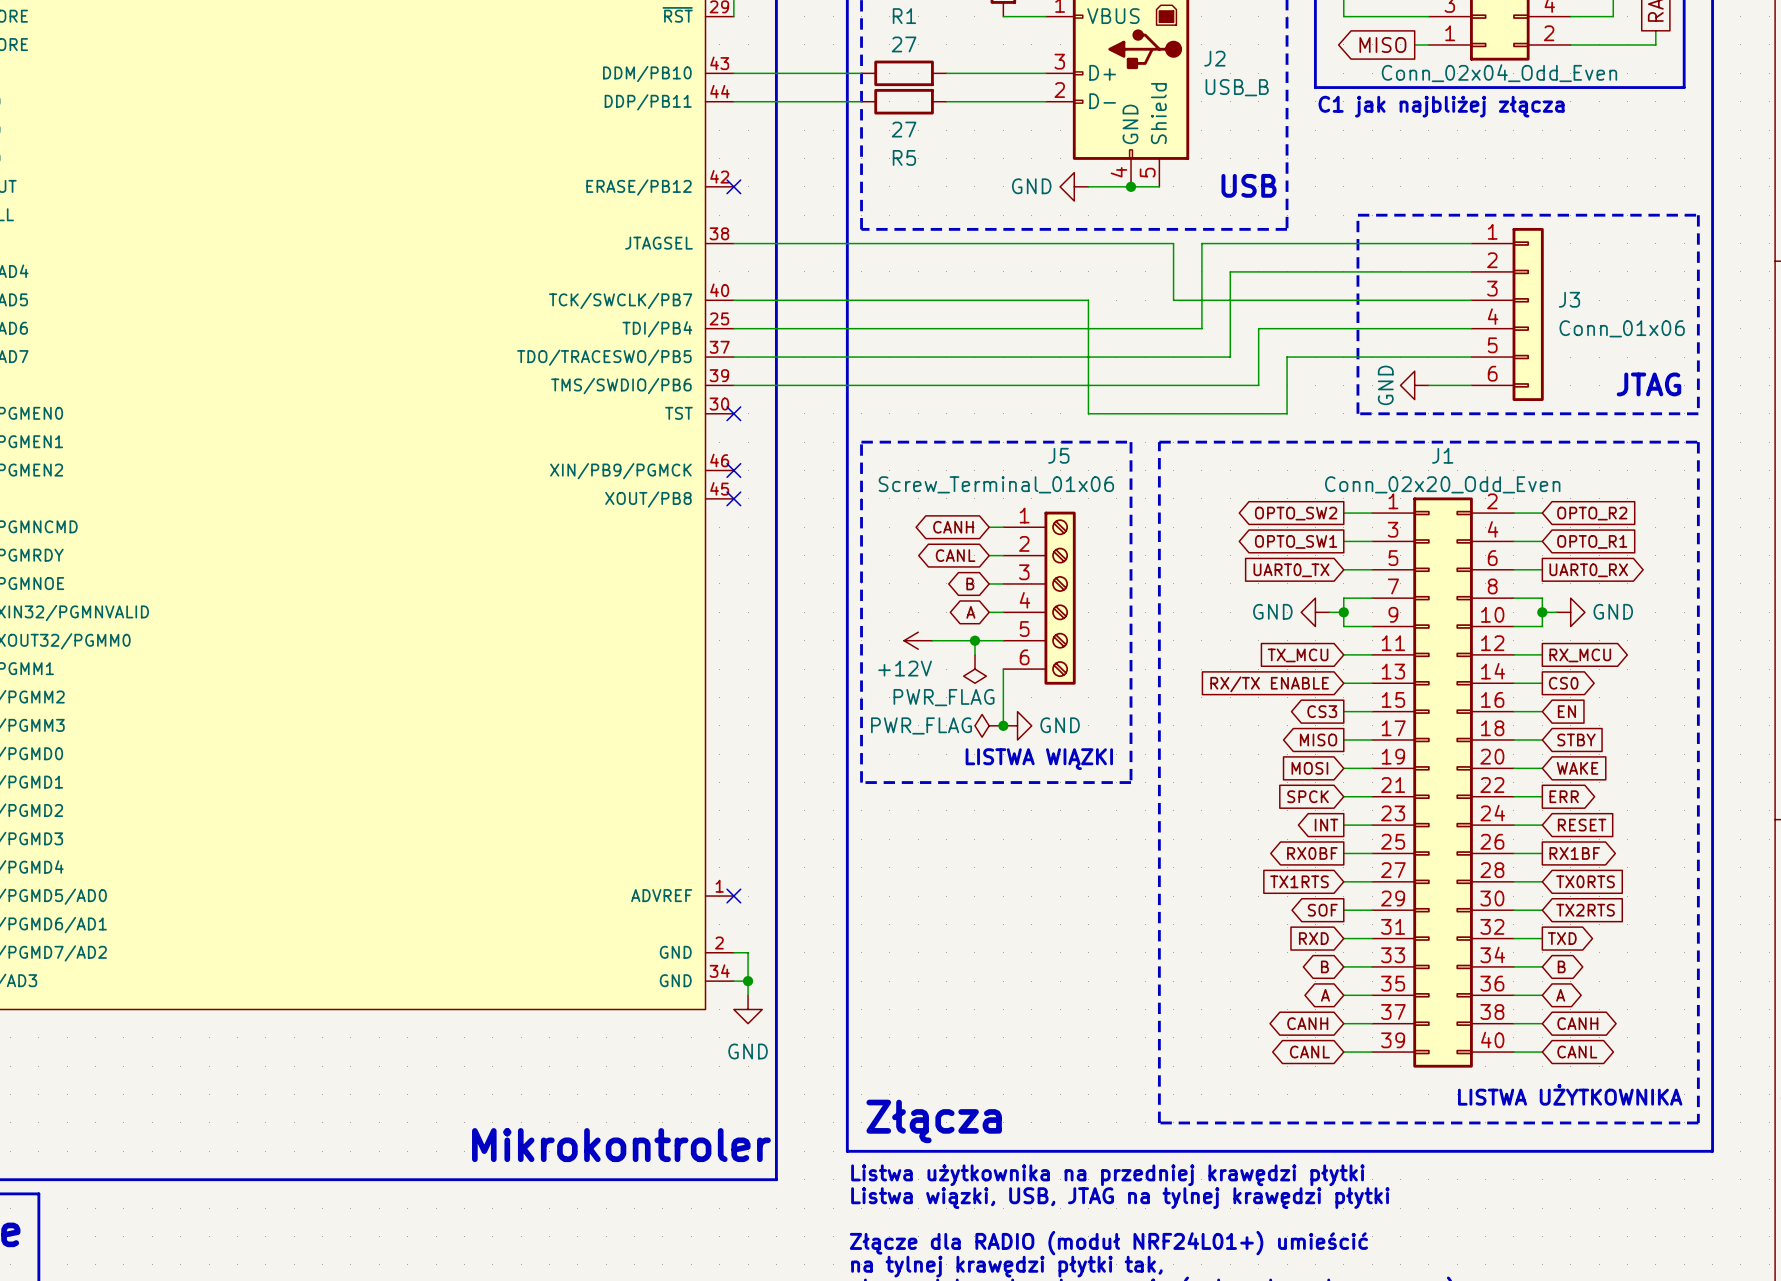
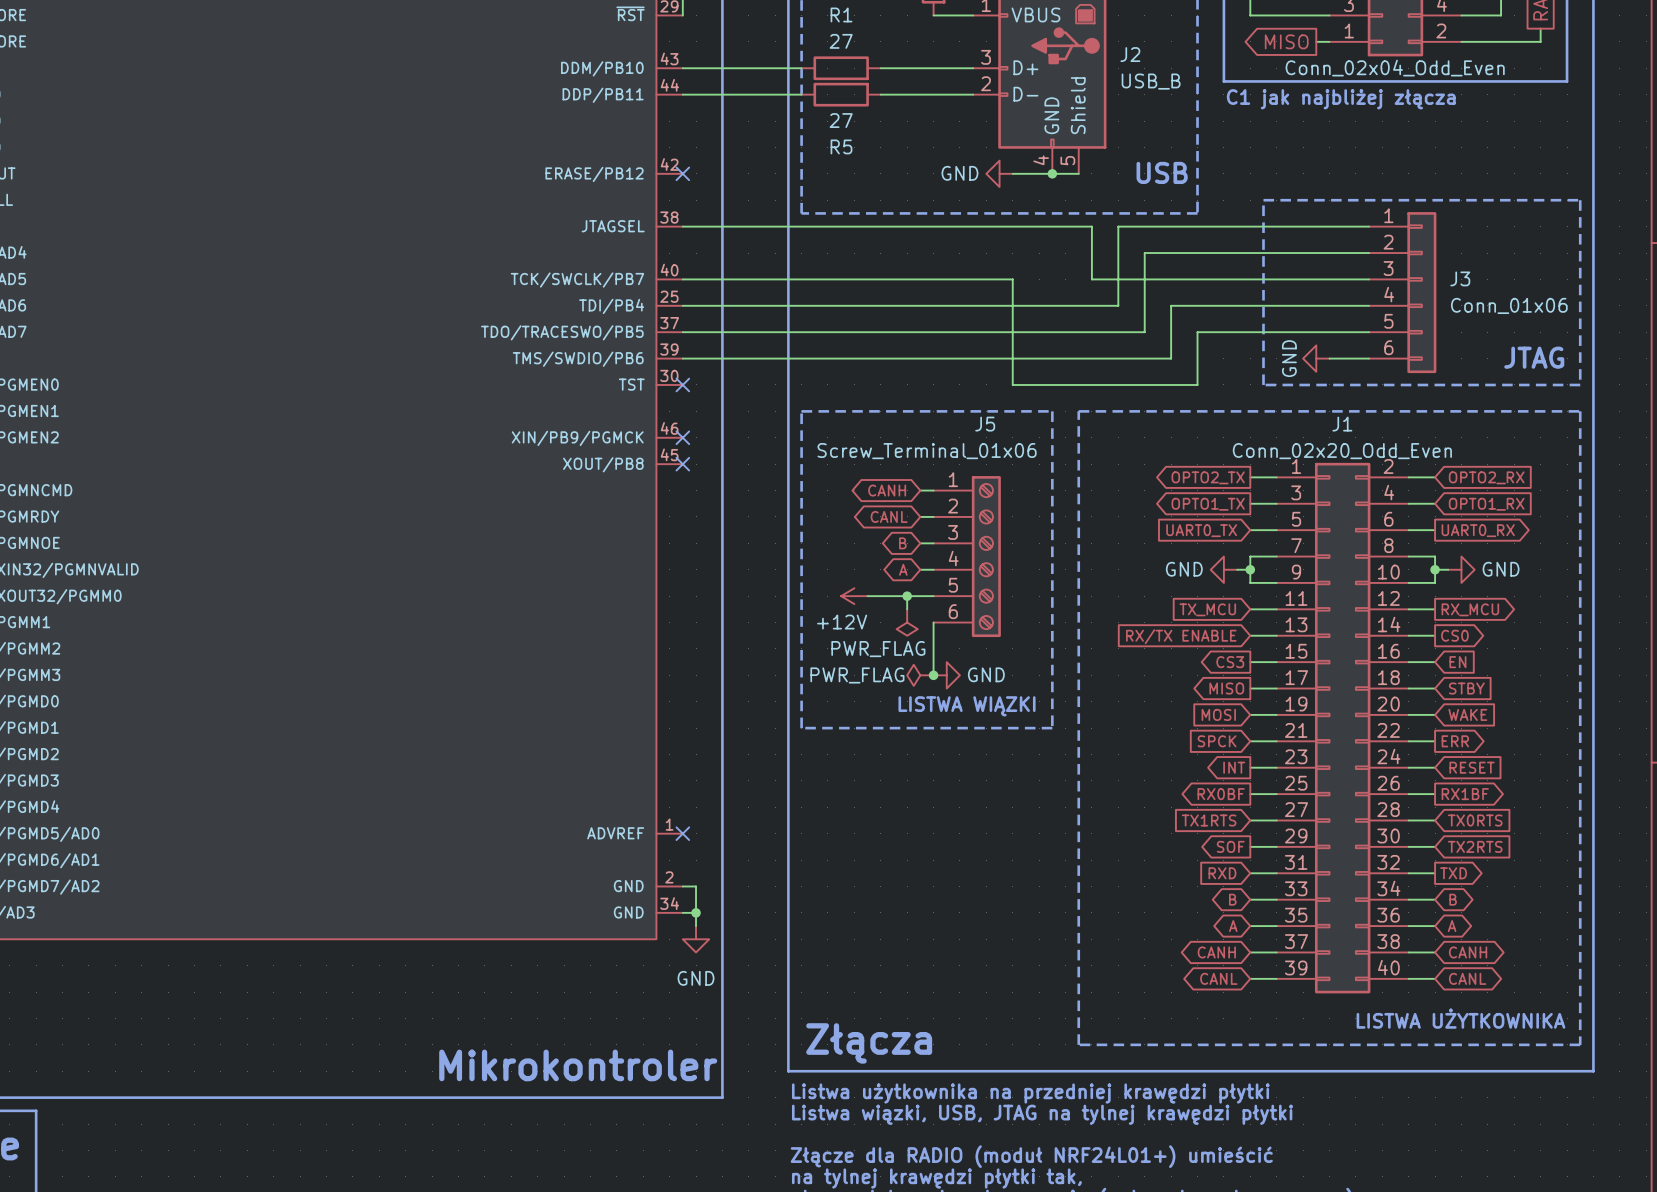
global label: OPTO_SW2 (1296, 513) -> OPTO2_TX (1208, 477)
global label: OPTO_R2 (1592, 513) -> OPTO2_RX (1486, 477)
global label: OPTO_SW1 (1296, 541) -> OPTO1_TX (1208, 504)
global label: OPTO_R1 (1592, 541) -> OPTO1_RX (1486, 504)

